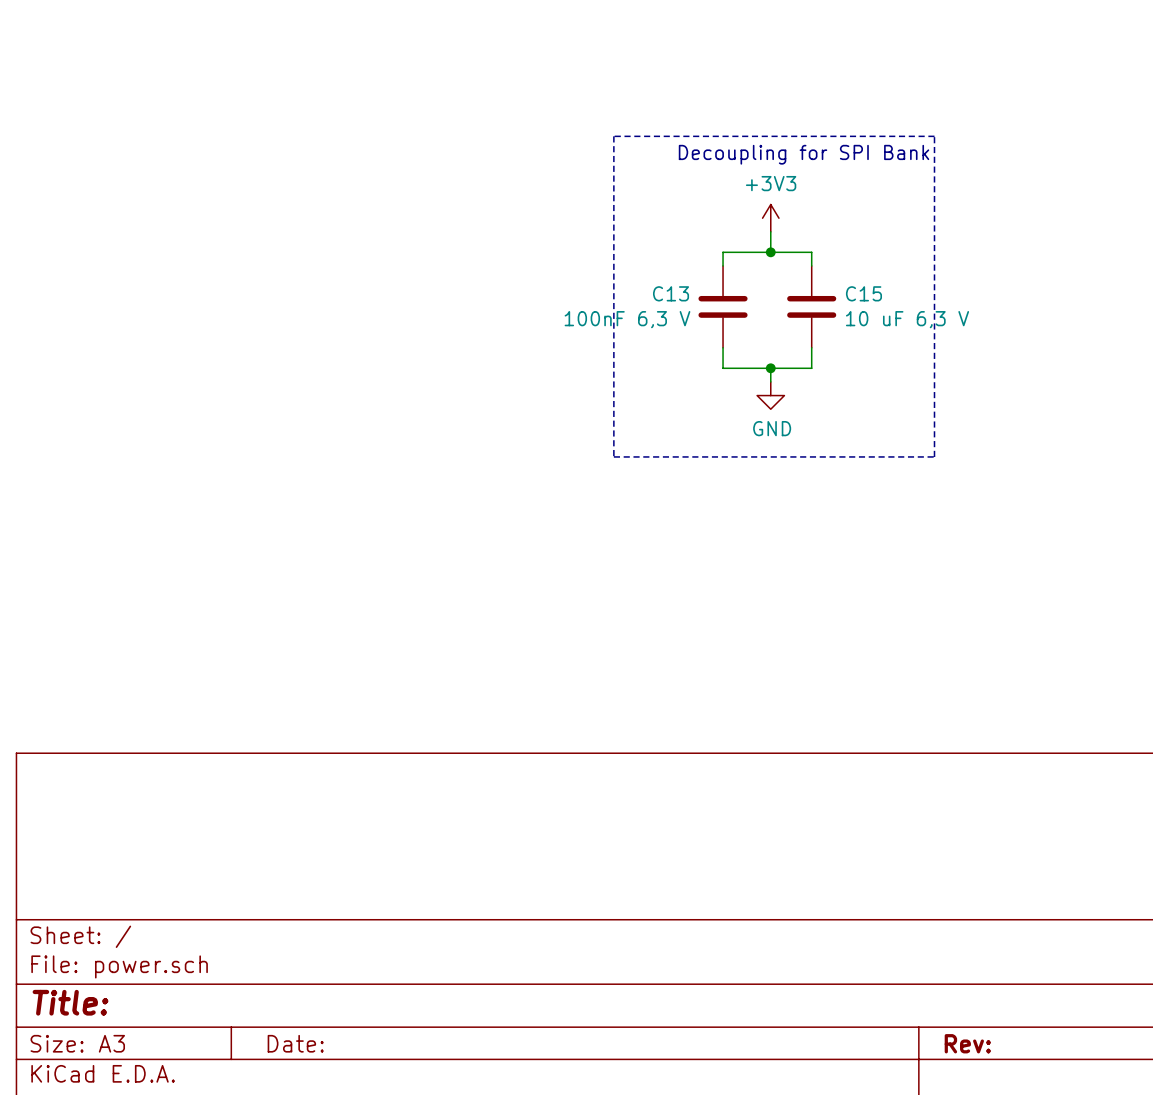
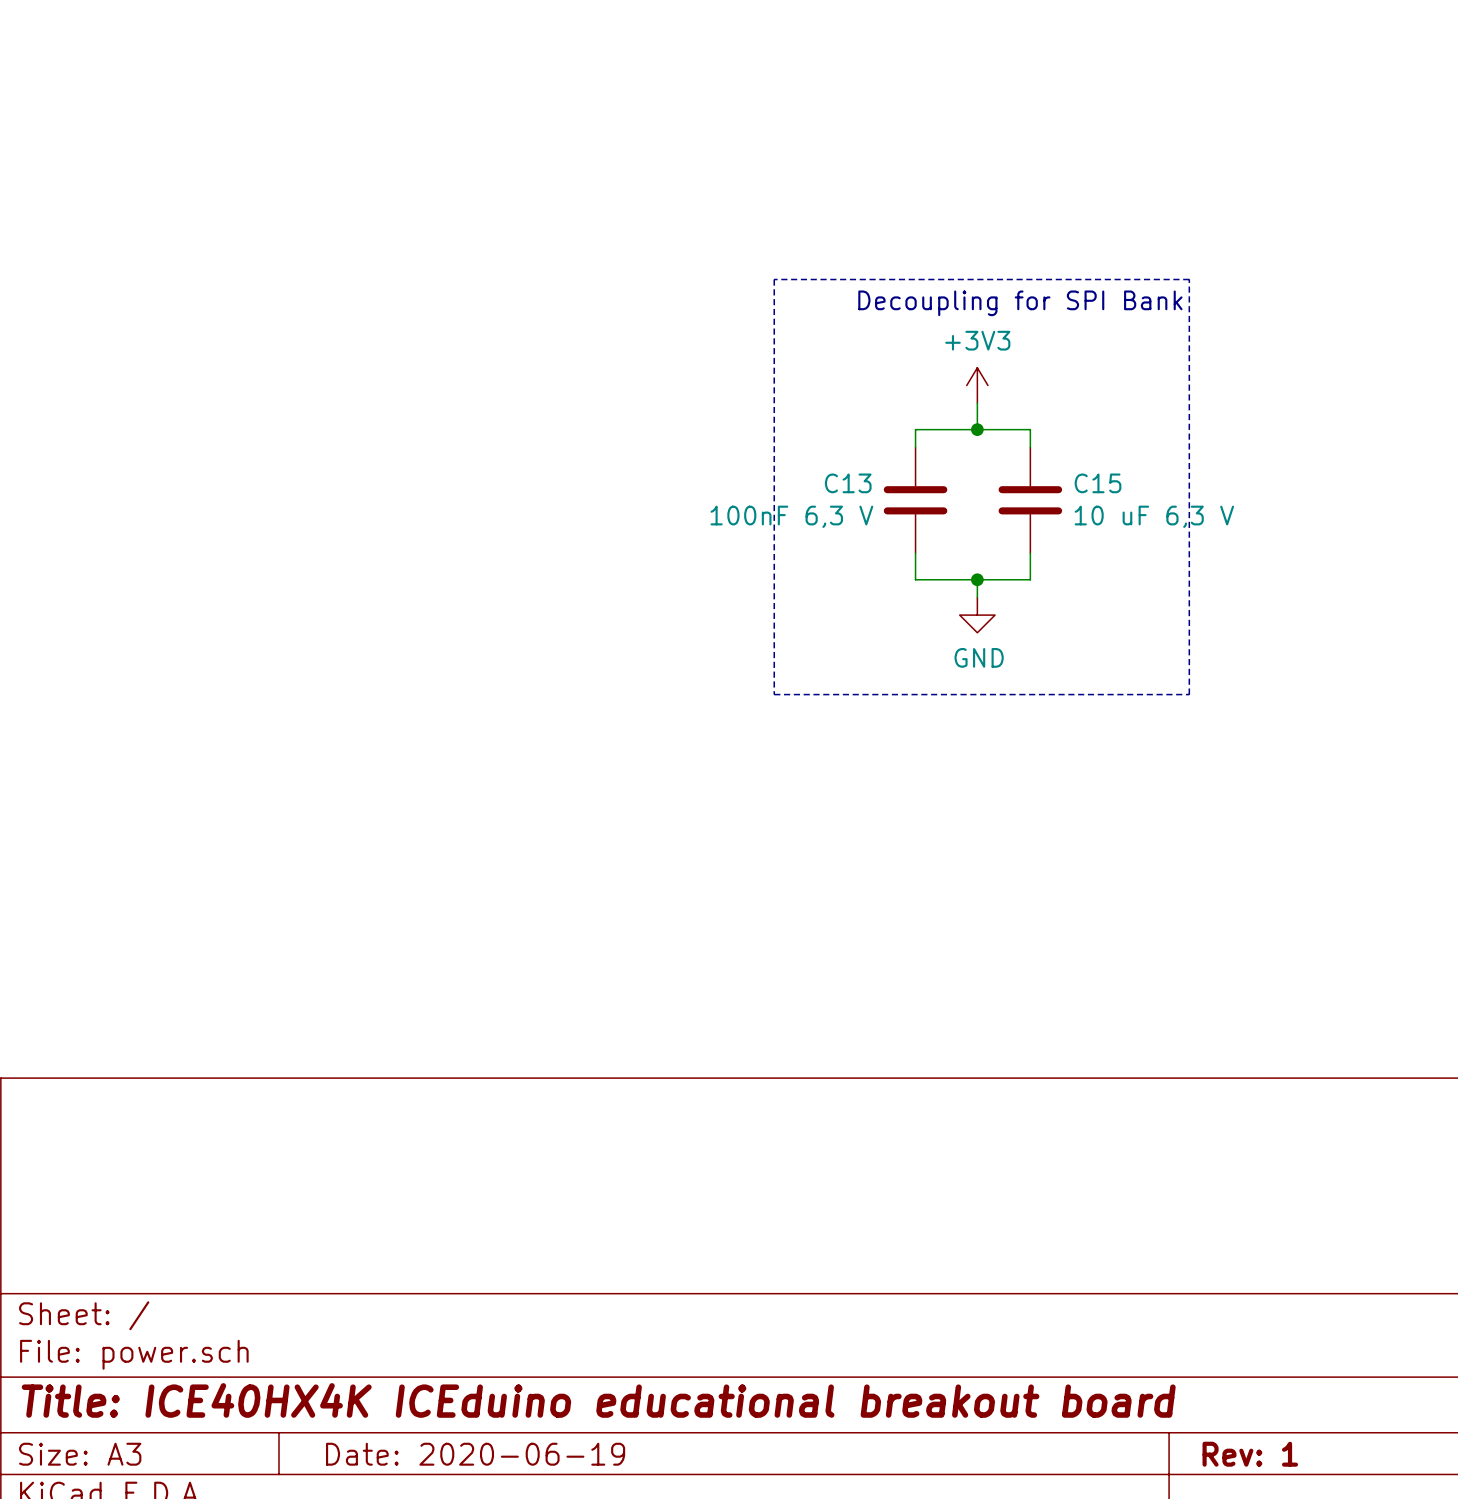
title block: Title: (70, 1002) -> Title: ICE40HX4K ICEduino educational breakout board (598, 1400)
title block: Date: (295, 1043) -> Date: 2020-06-19 (475, 1454)
title block: Rev: (967, 1043) -> Rev: 1 (1250, 1454)

